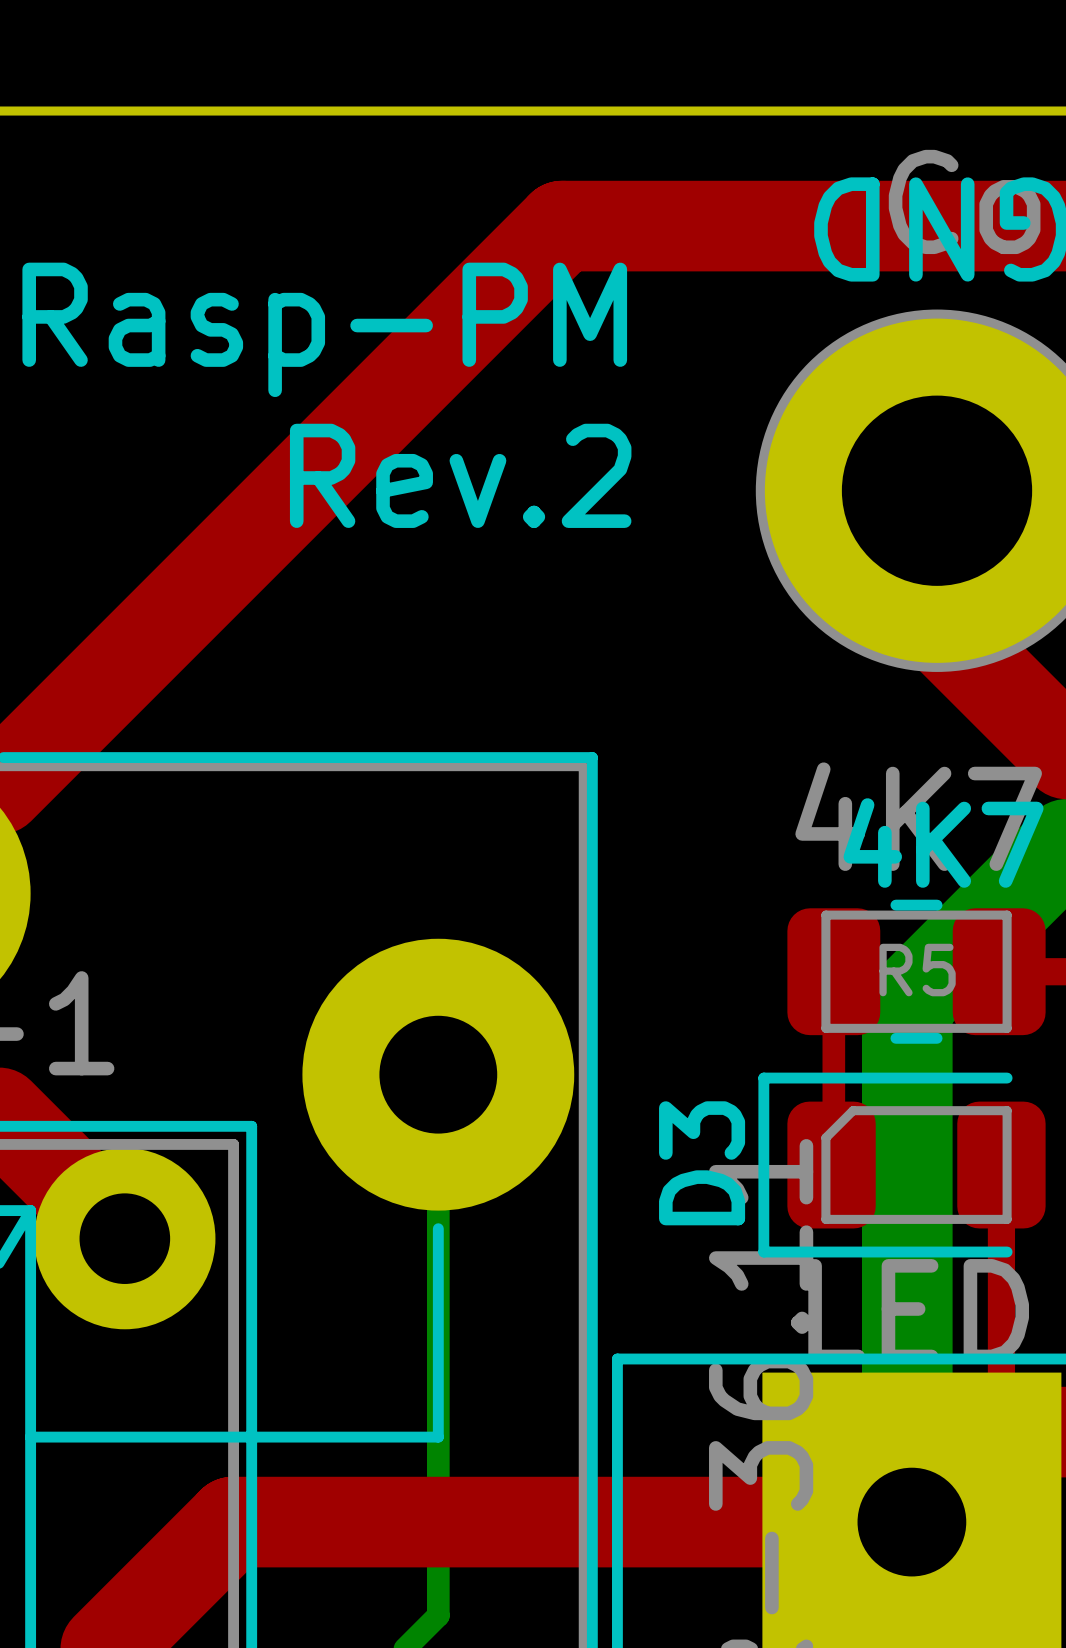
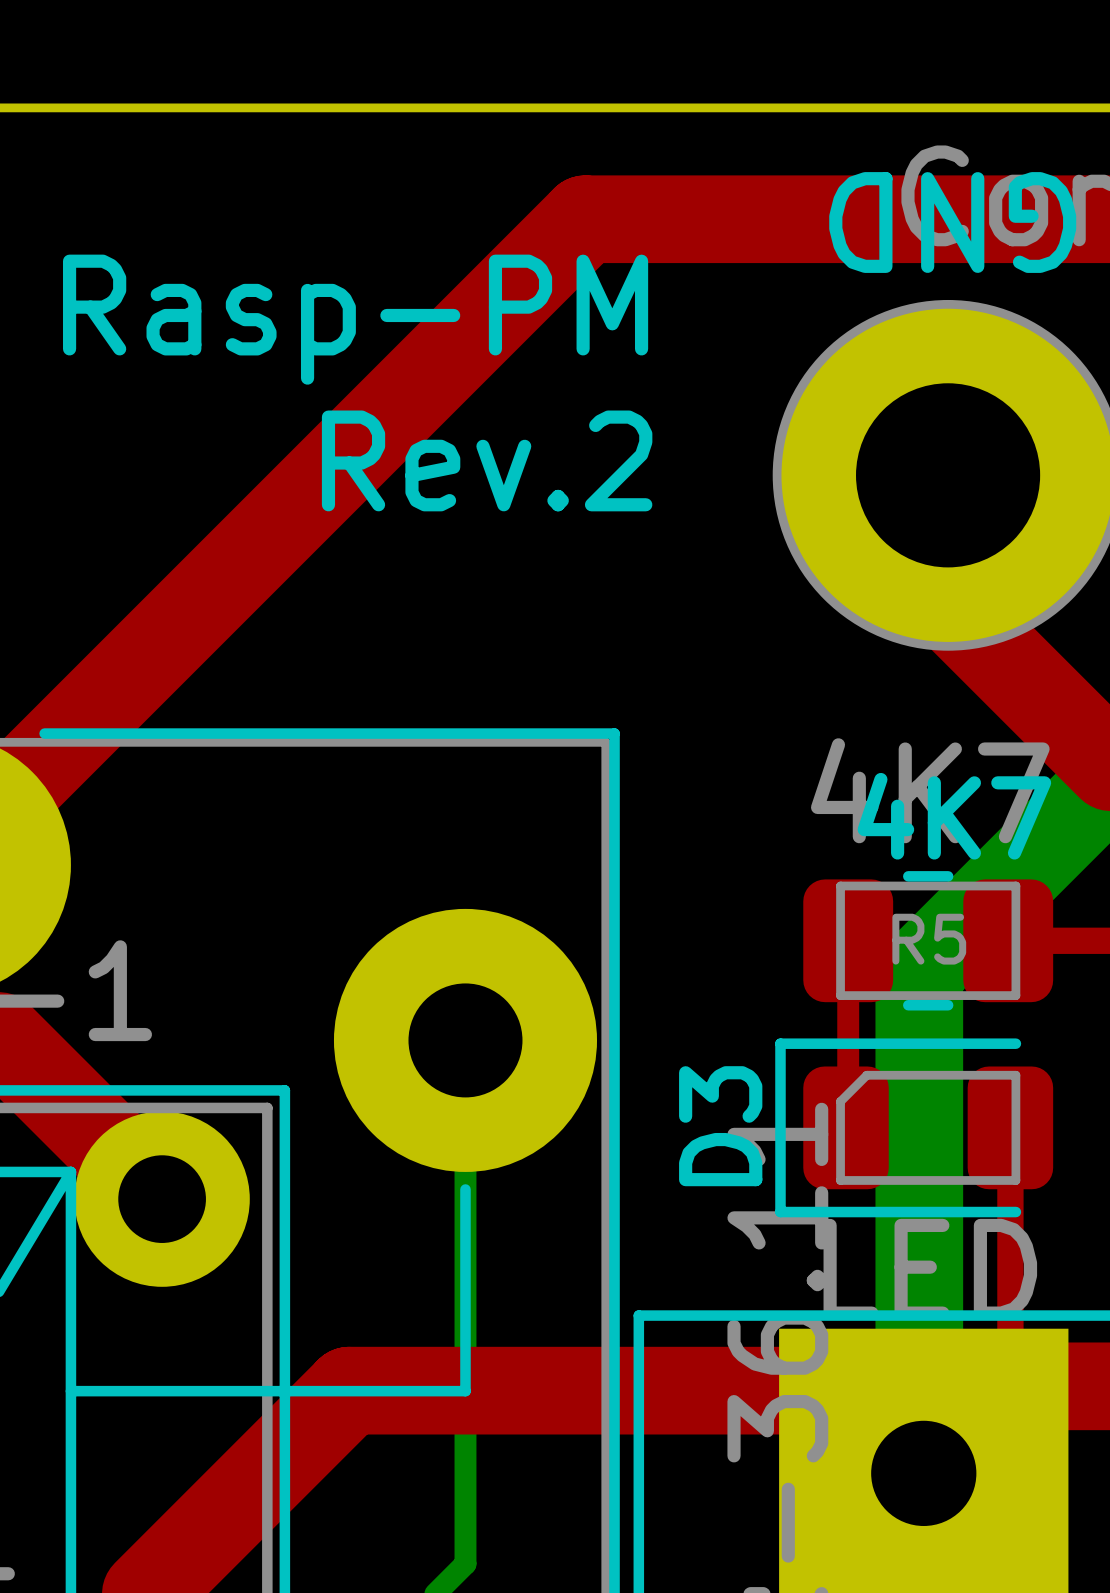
top track: (232, 1522) (911, 1522) -> (266, 1473) (349, 1390) (833, 1390) (919, 1476)

